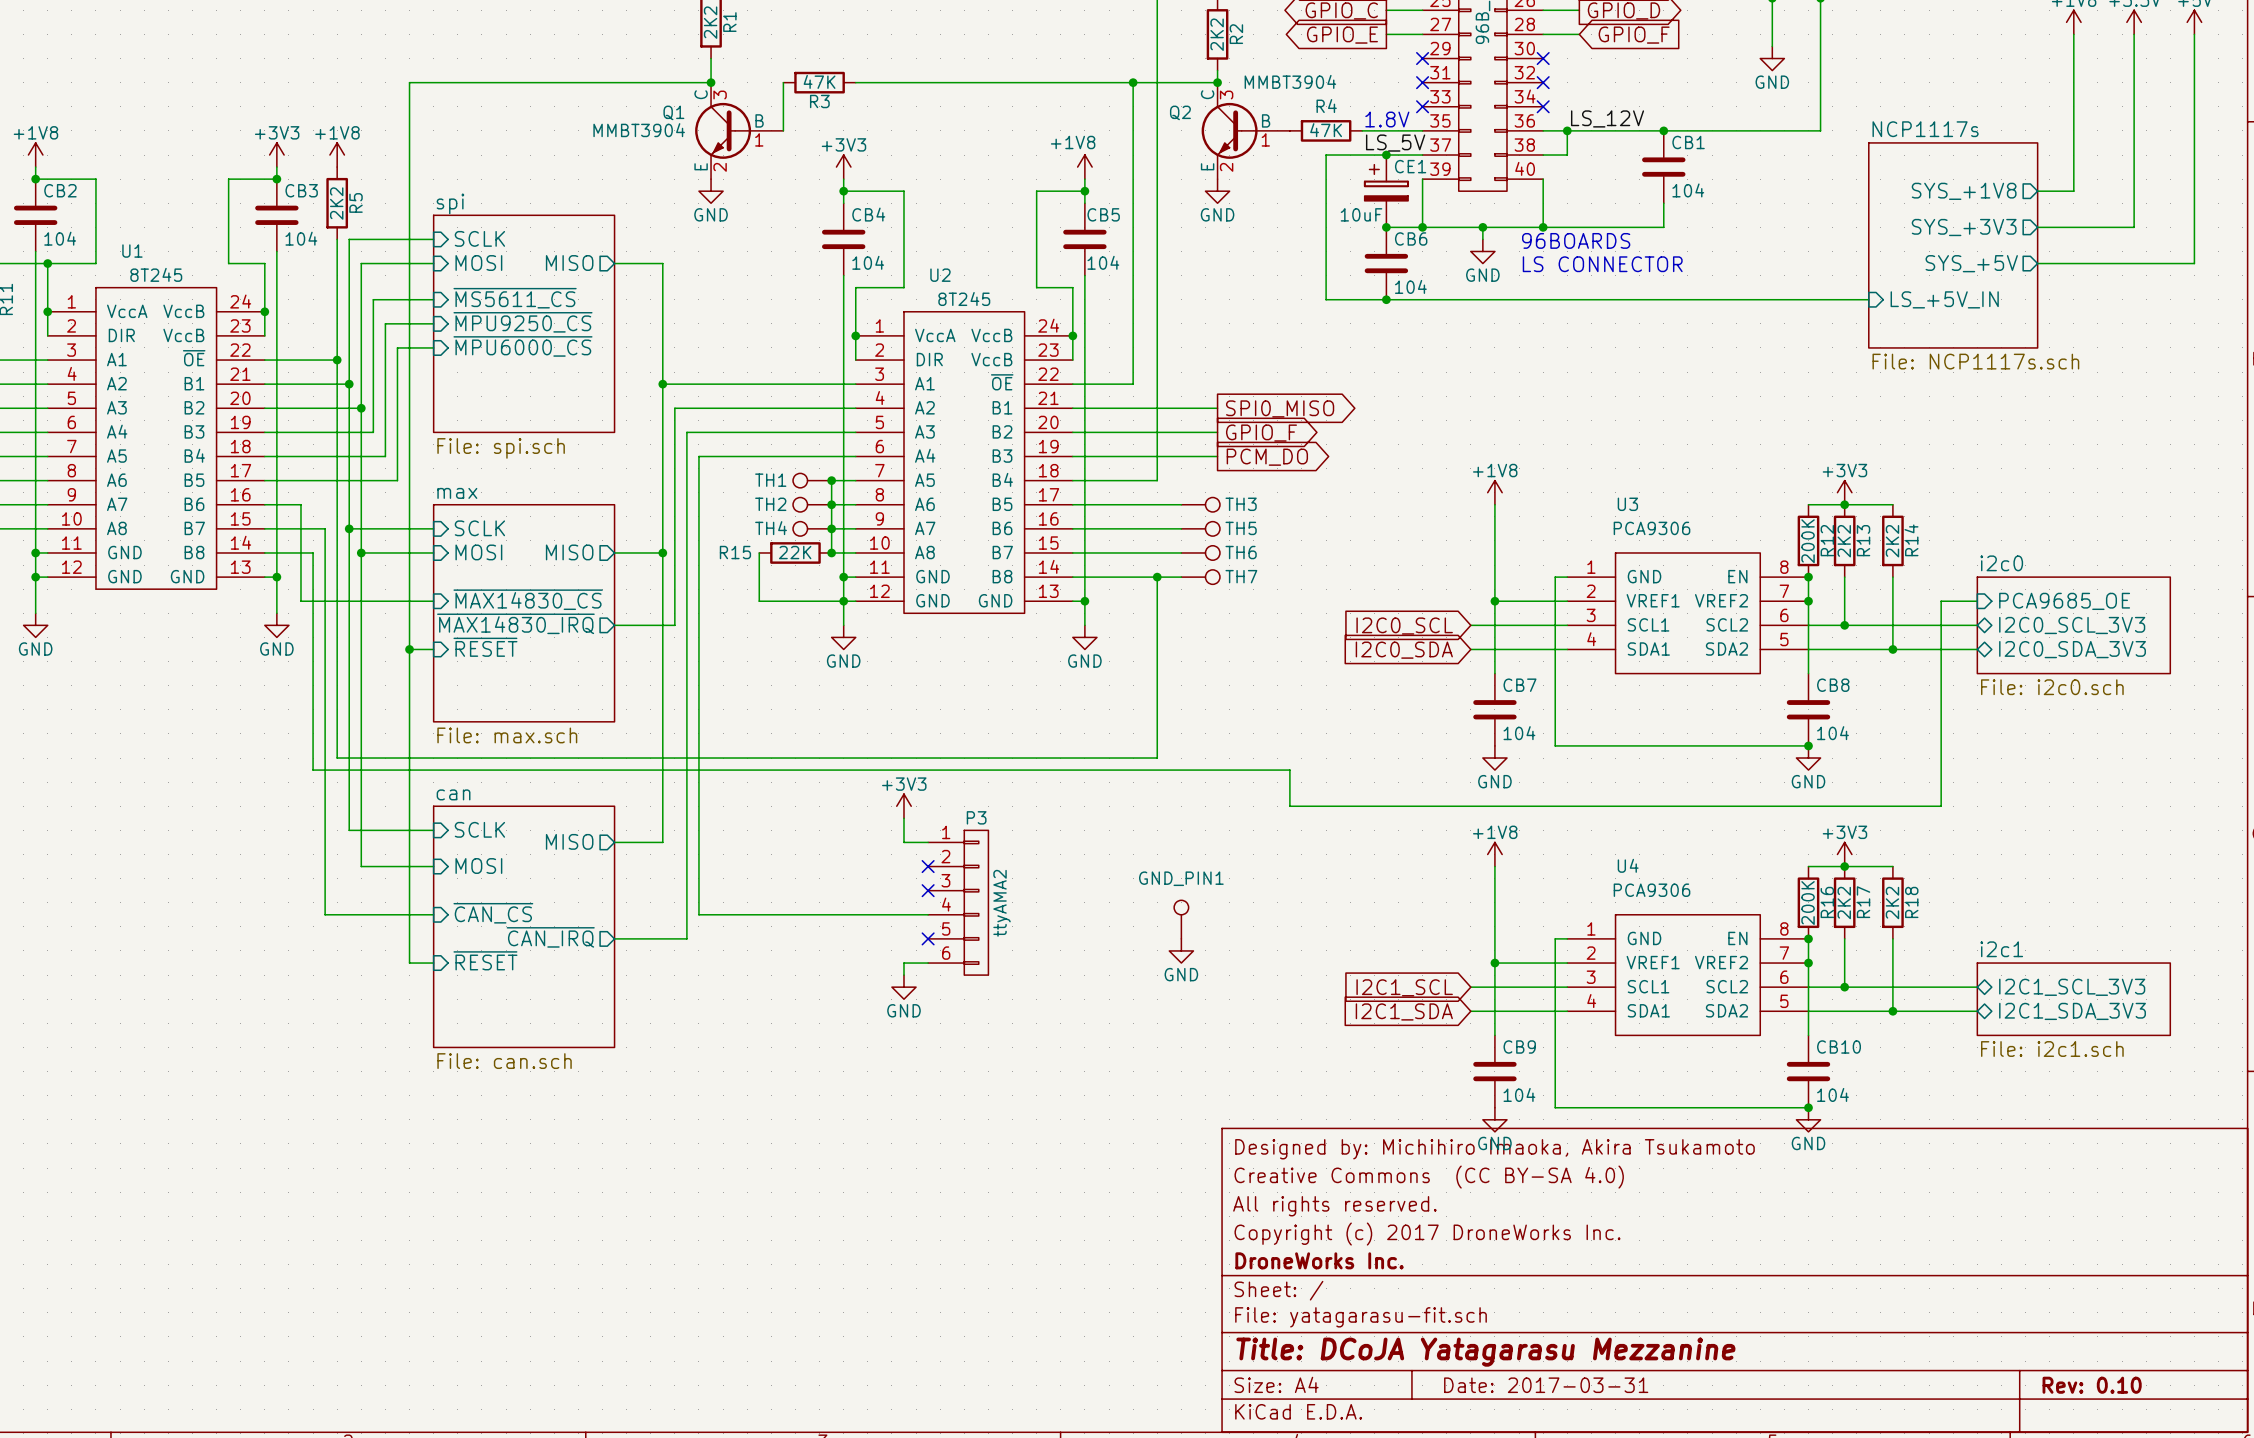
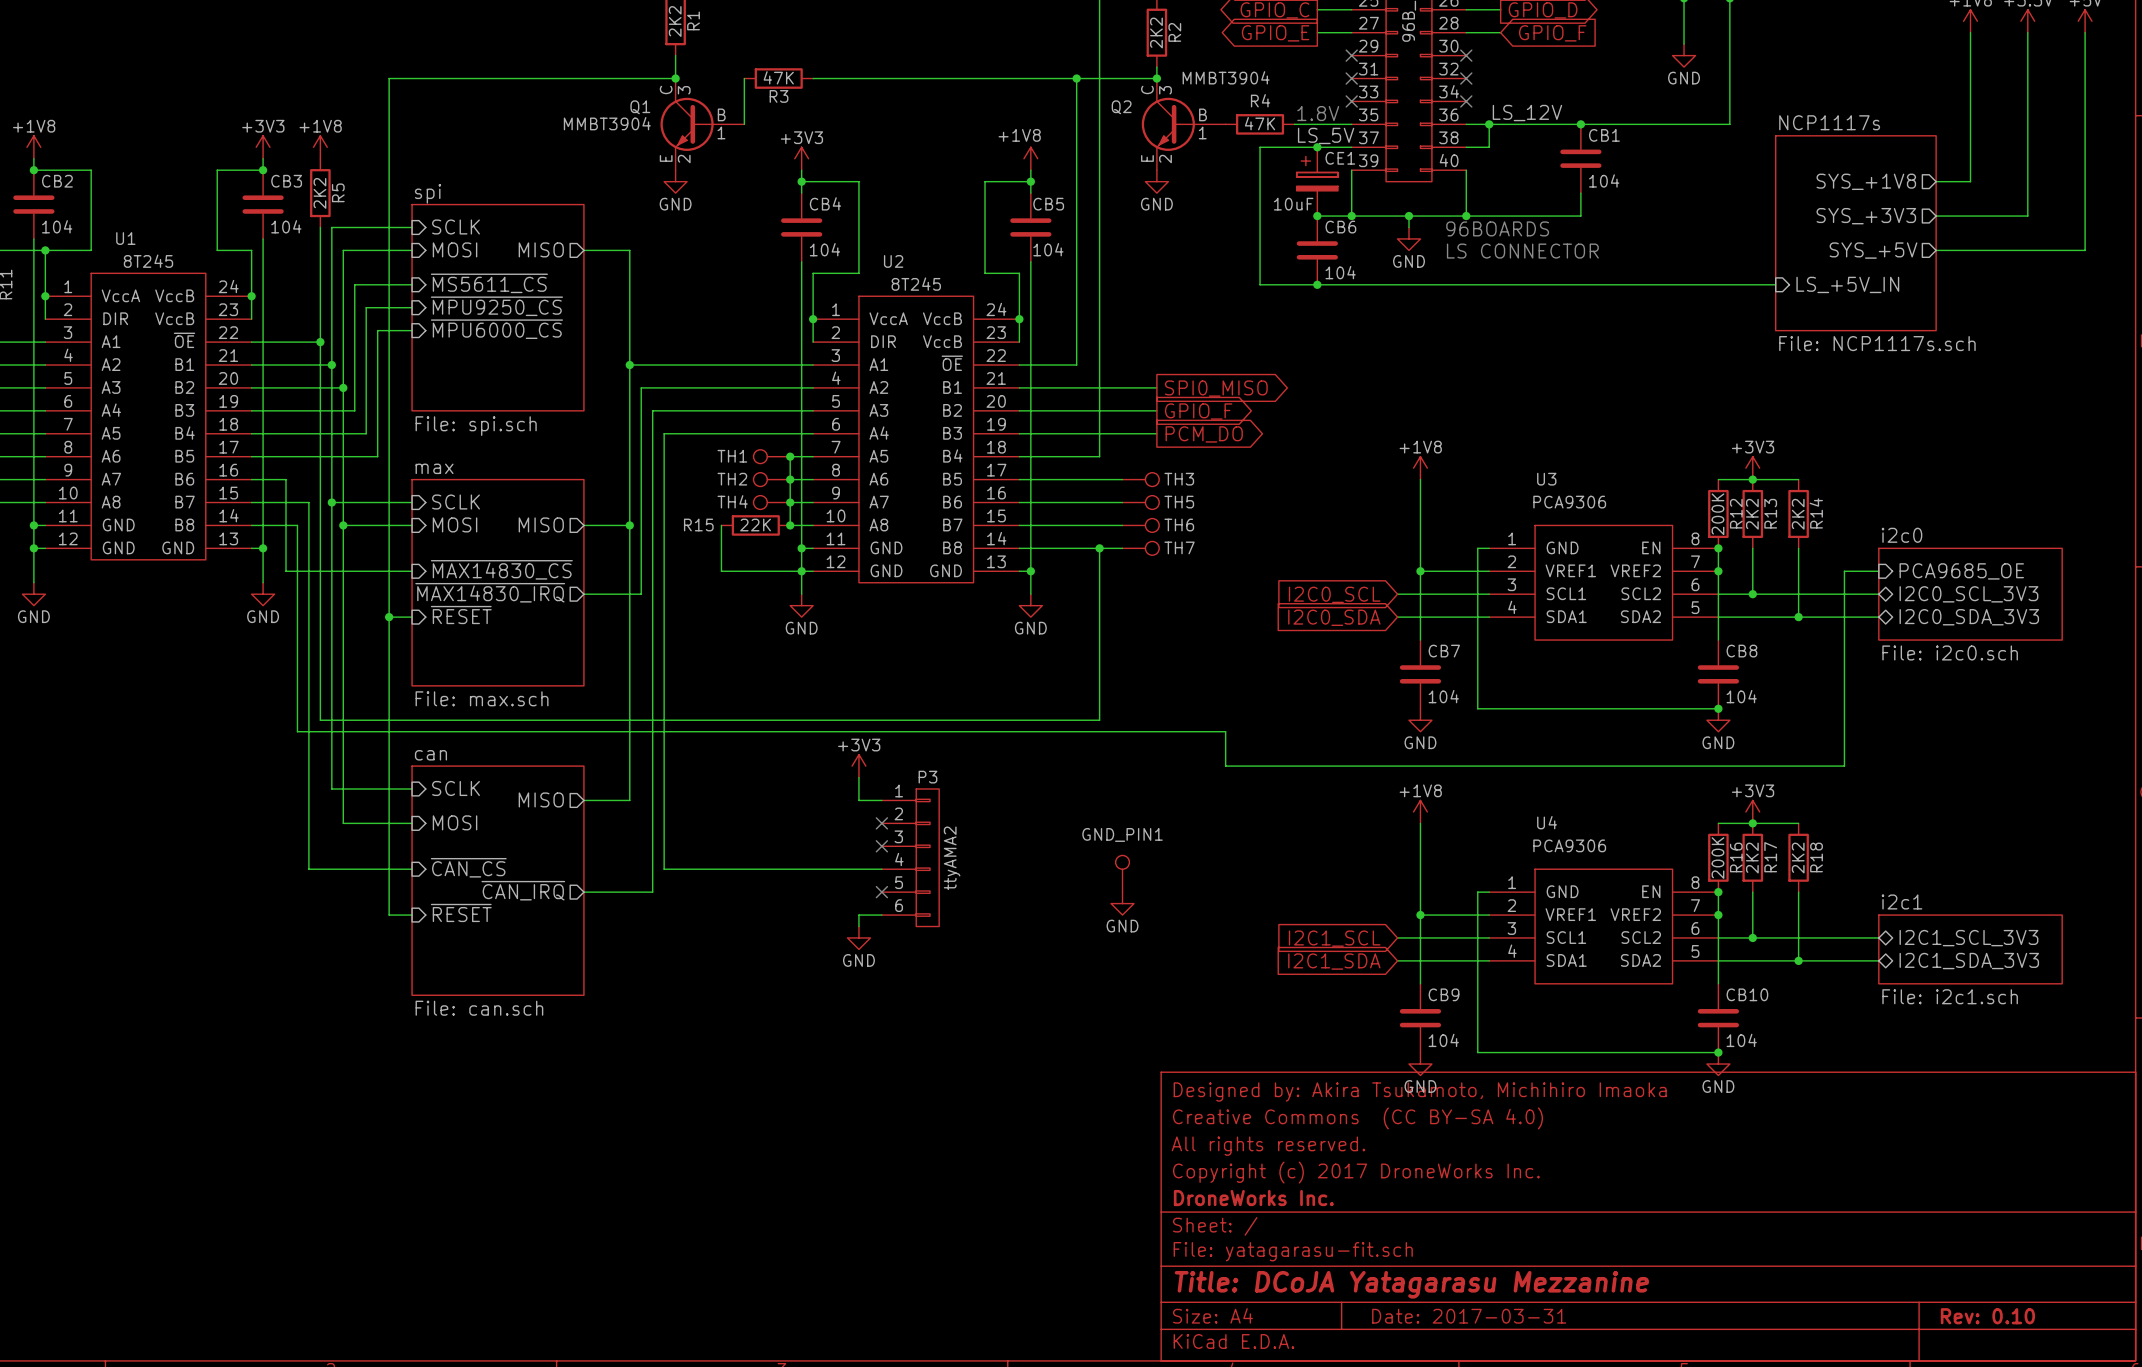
title block: Designed by: Michihiro Imaoka, Akira Tsukamoto (1494, 1149) -> Designed by: Akira Tsukamoto, Michihiro Imaoka (1420, 1092)

